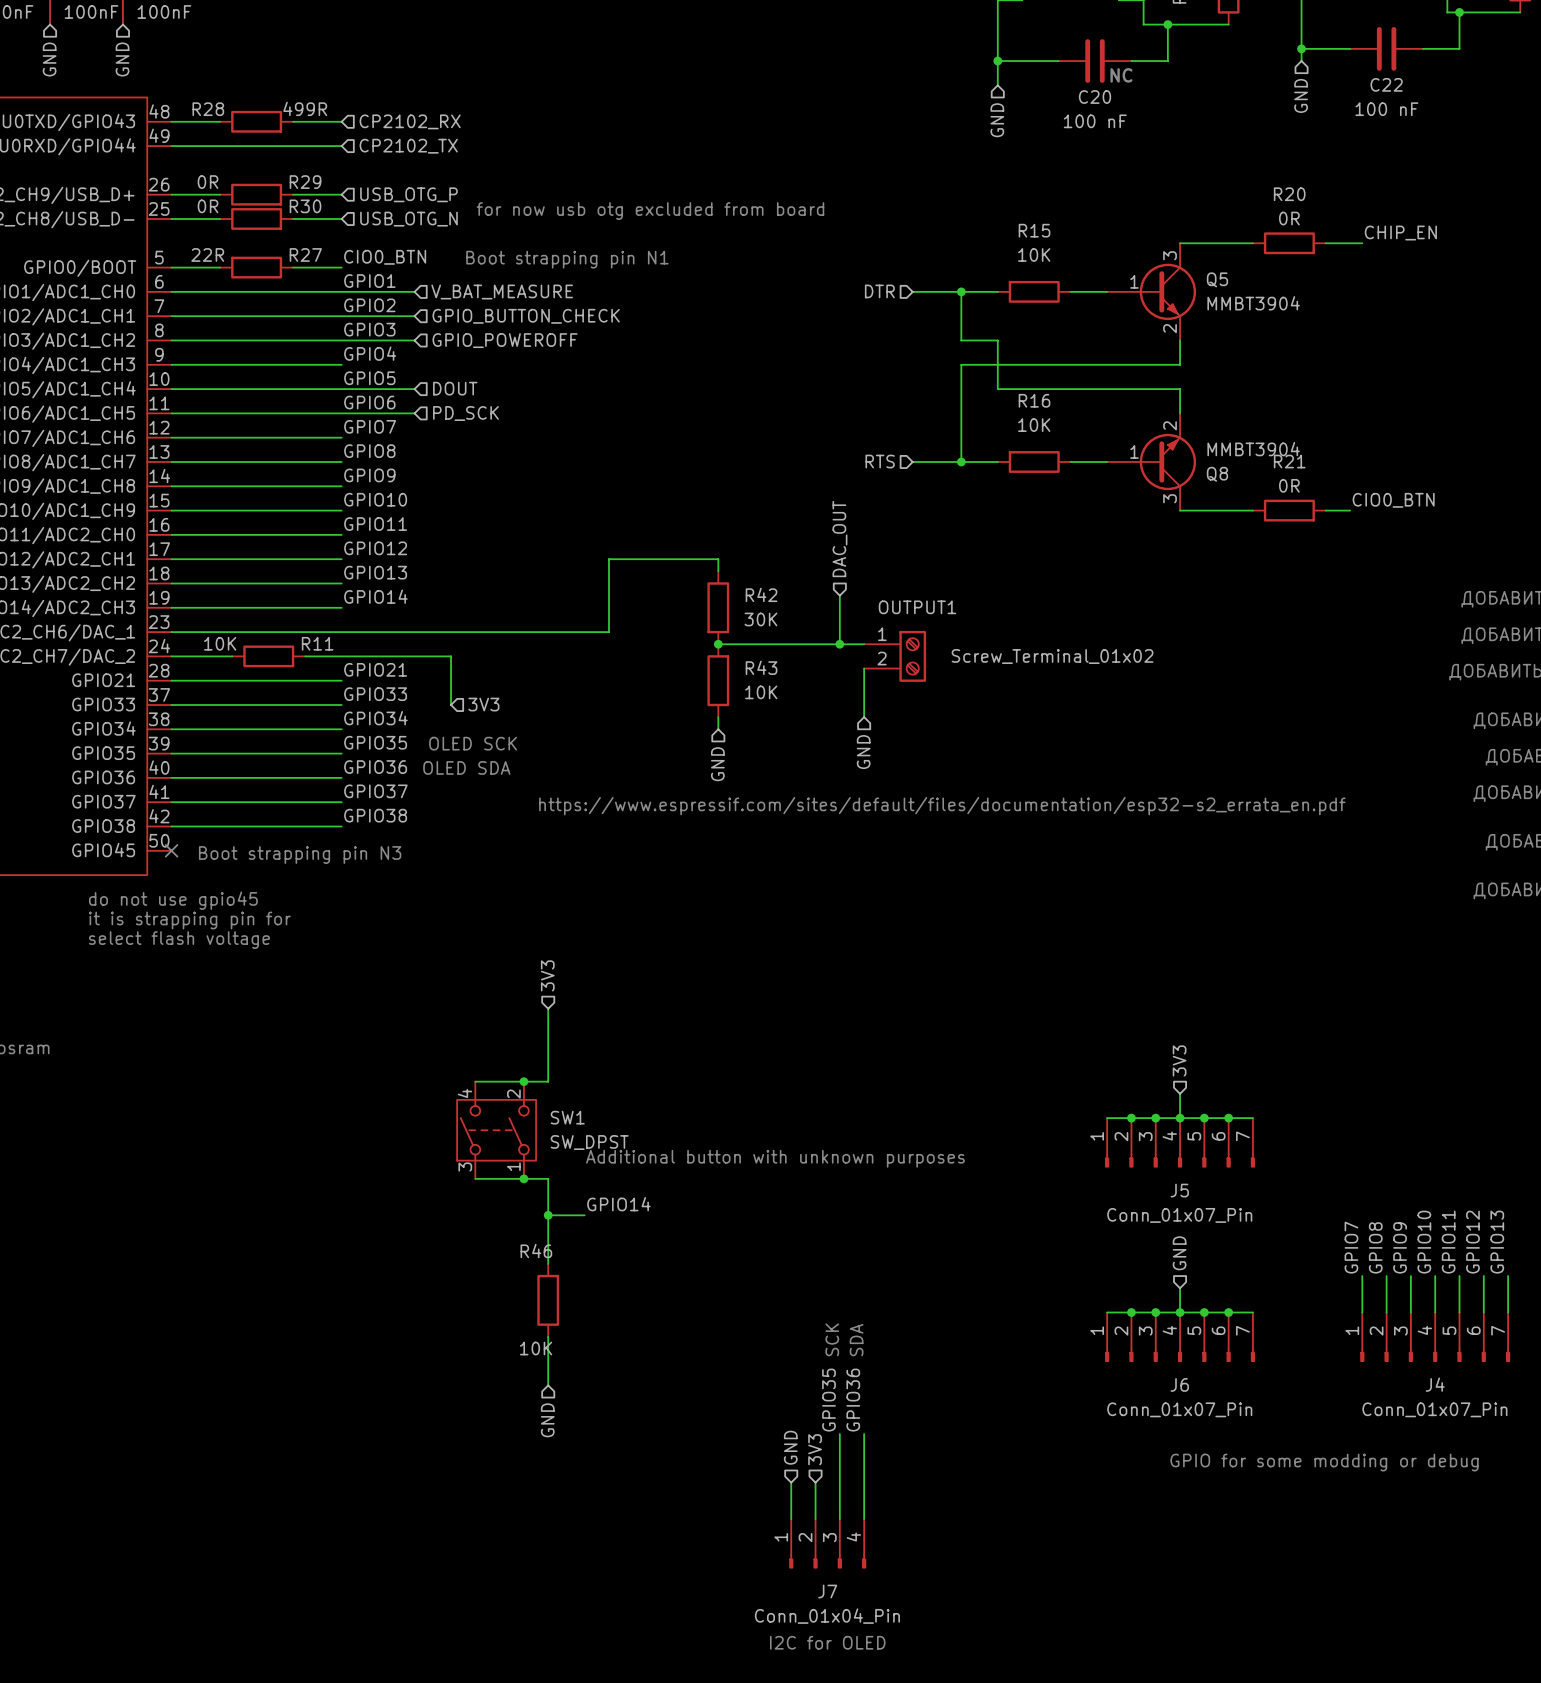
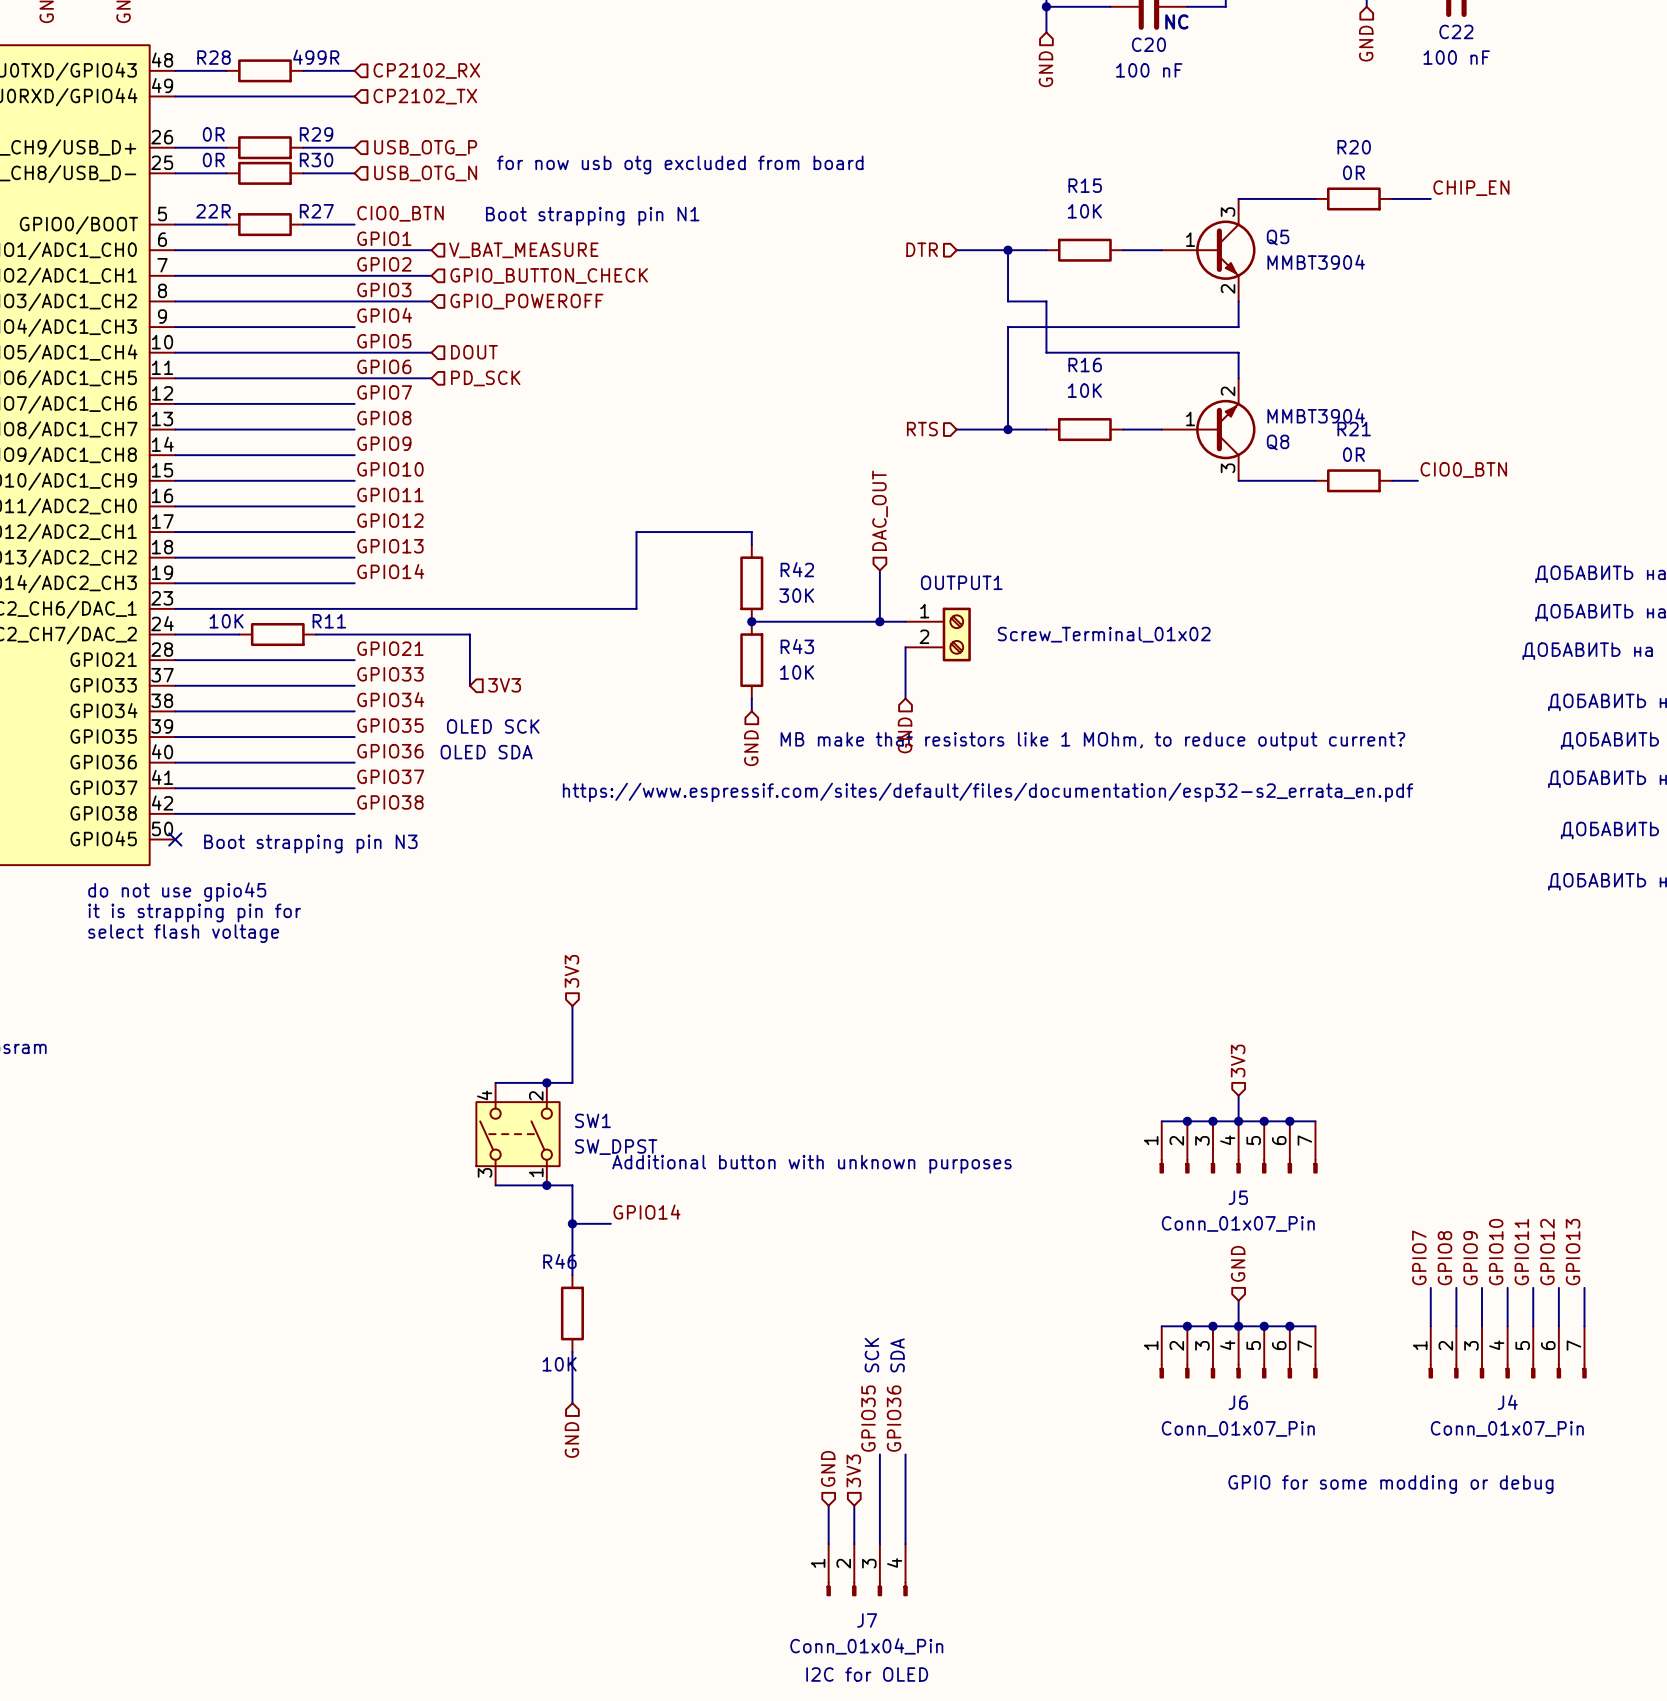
text: none -> MB make that resistors like 1 MOhm, to reduce output current? (1092, 741)

